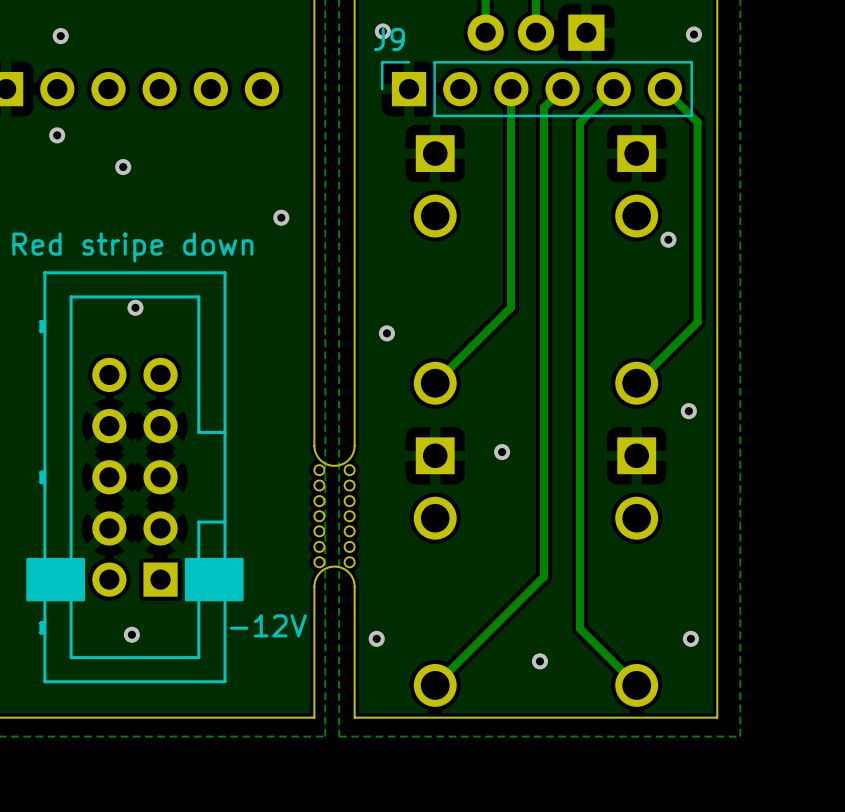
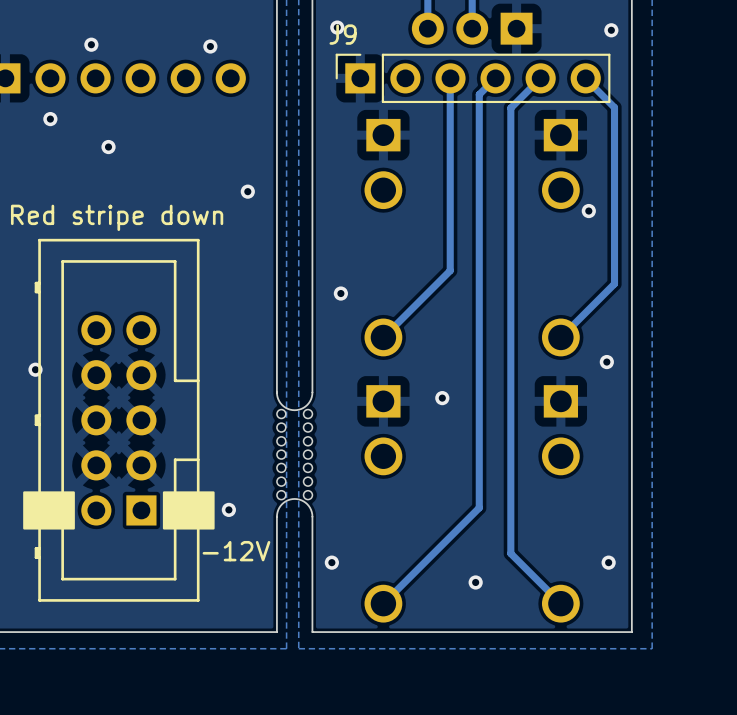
via position: (60, 36) -> (91, 44)
via: none -> (210, 46)
via: (135, 307) -> none
via: none -> (35, 369)
via: none -> (228, 509)
via: (131, 634) -> none

